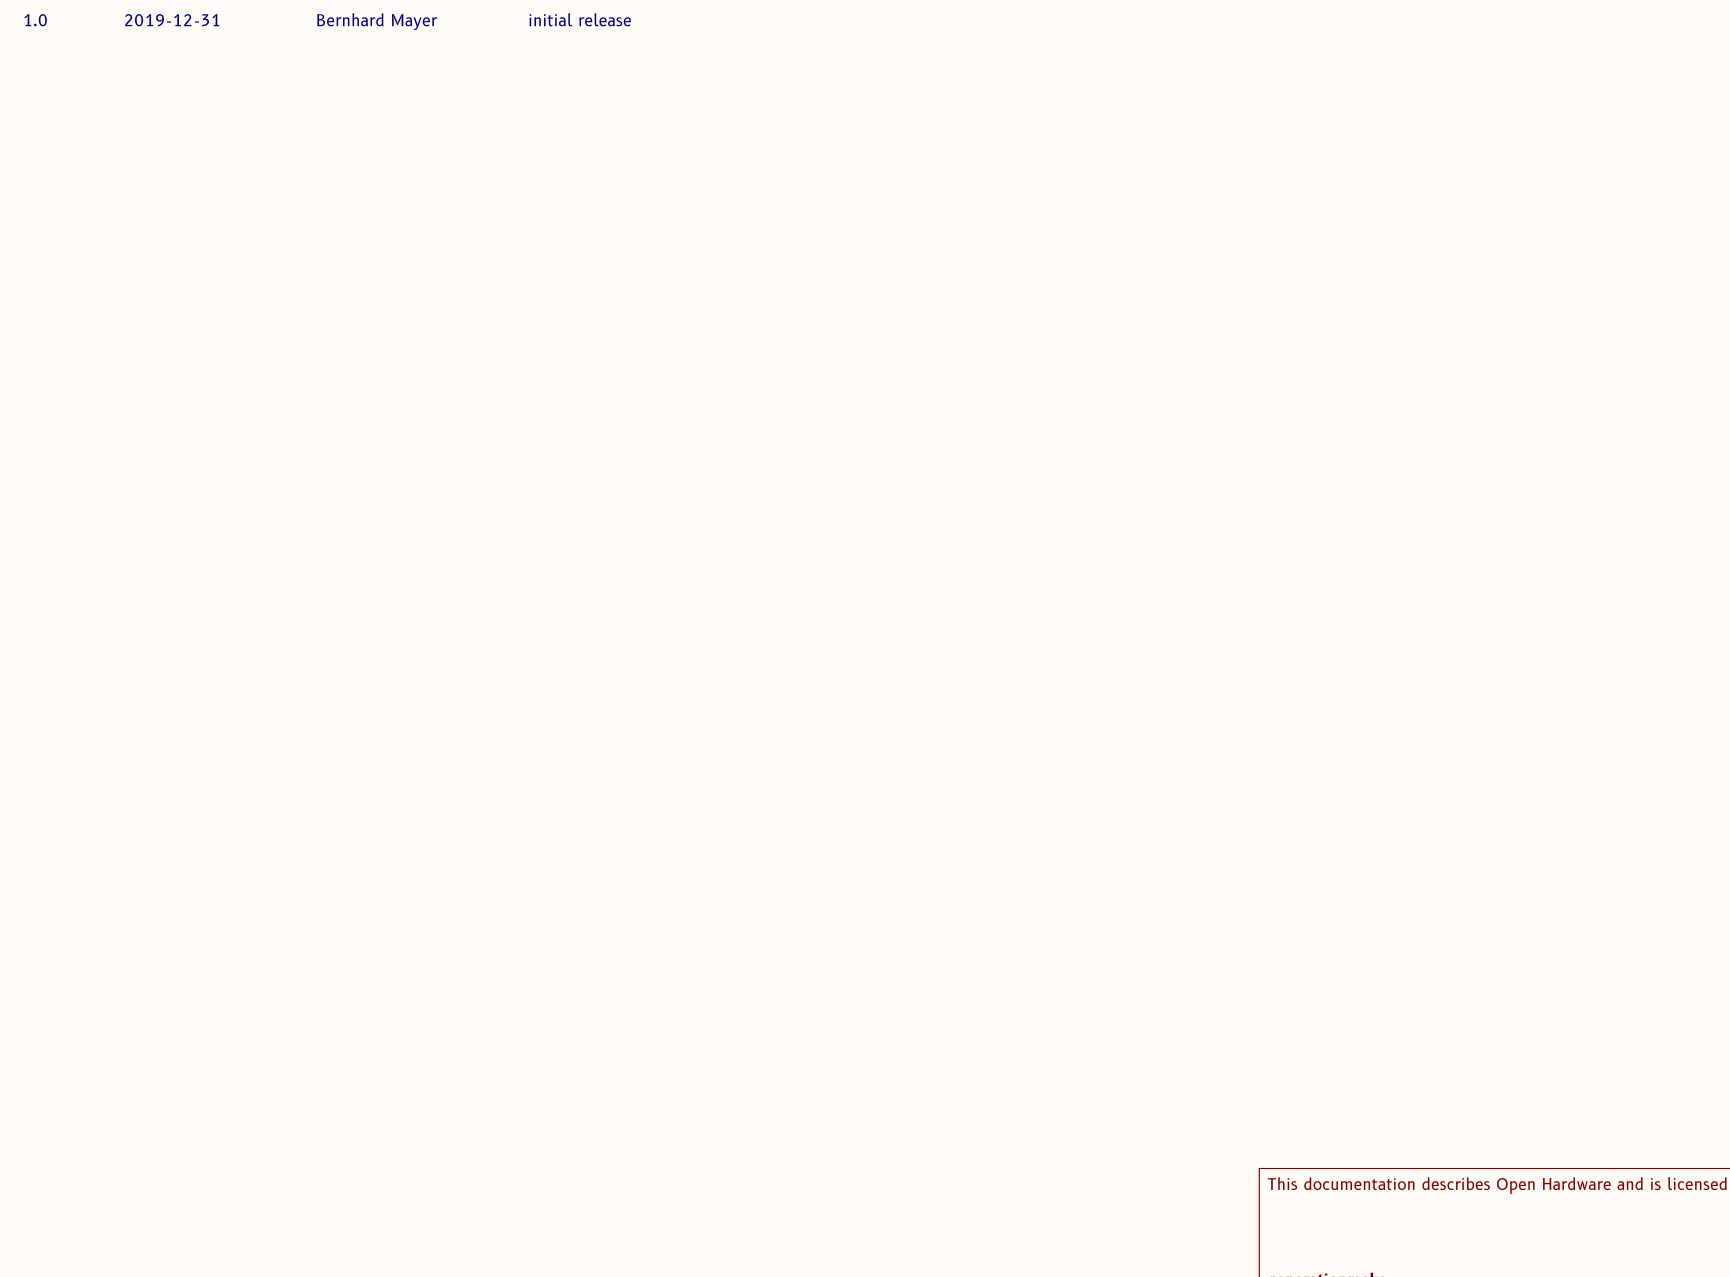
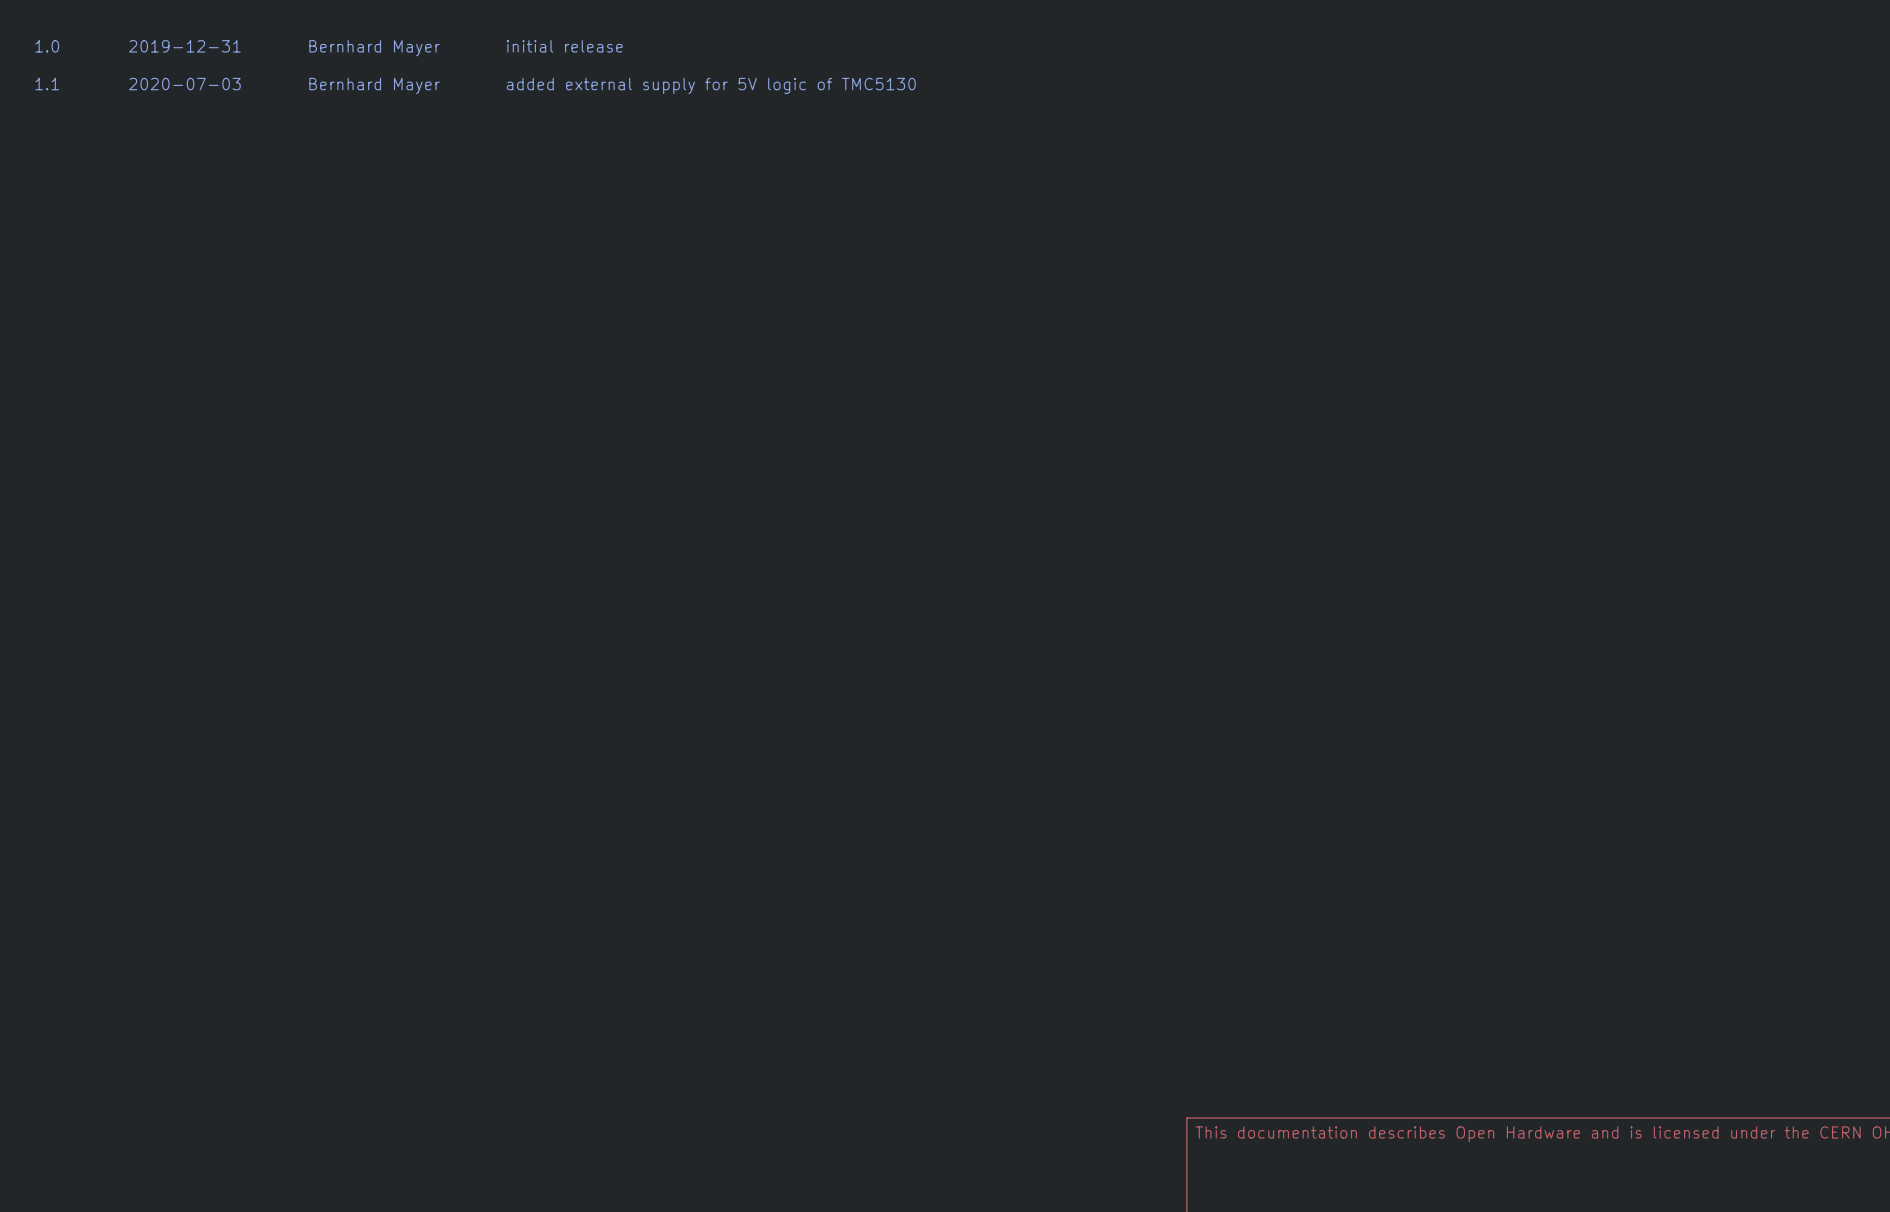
text: none -> 1.1 (47, 84)
text: none -> 2020-07-03 (184, 84)
text: none -> Bernhard Mayer (374, 85)
text: none -> added external supply for 5V logic of TMC5130 (711, 85)

